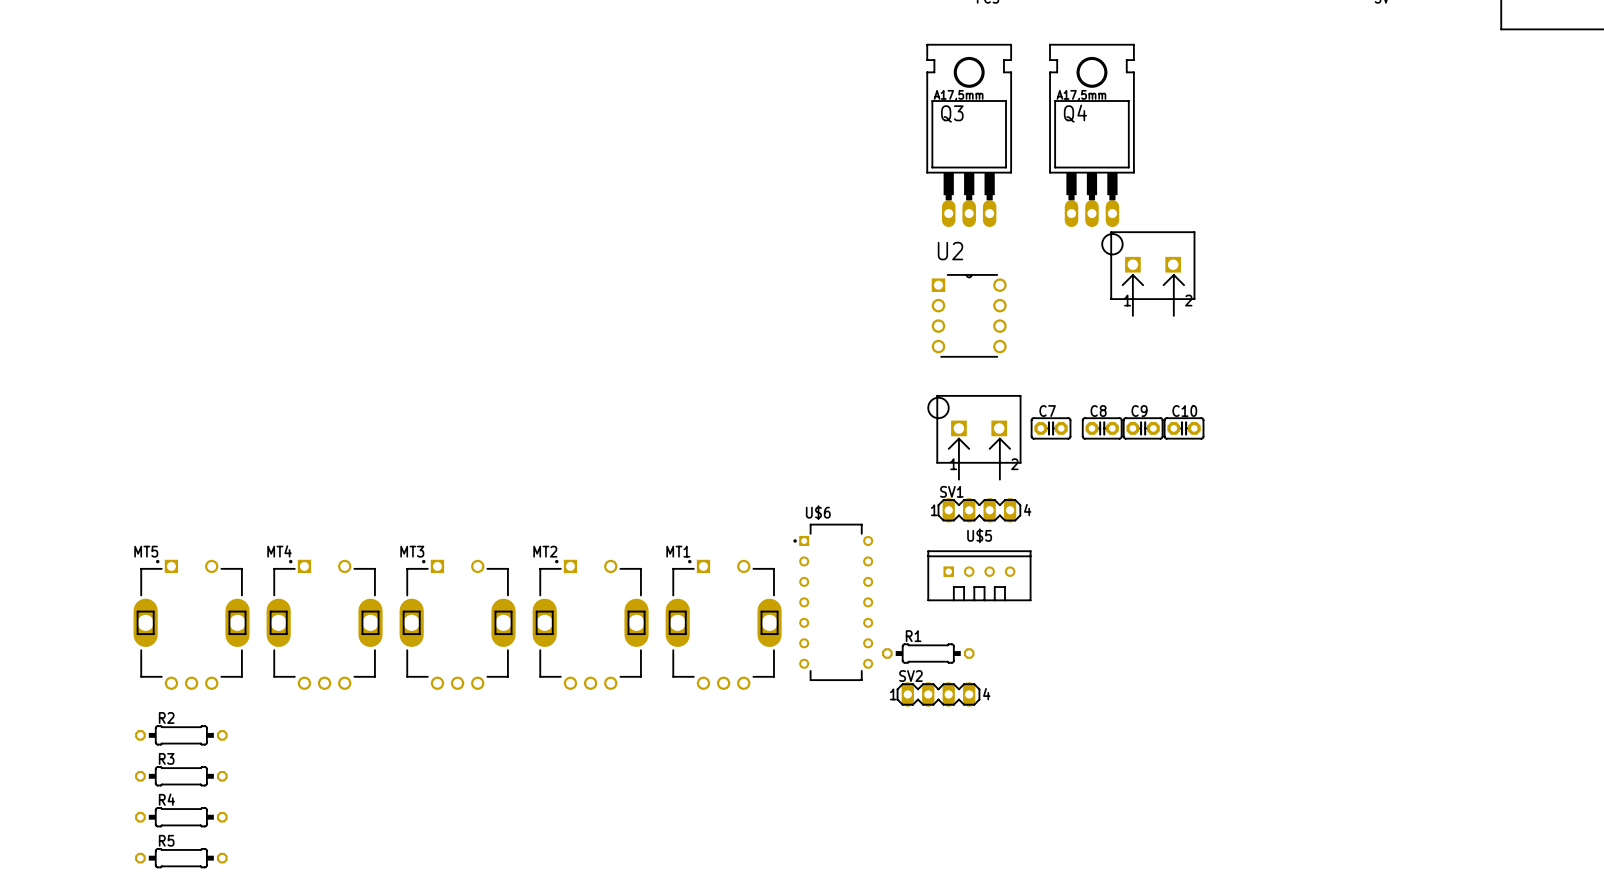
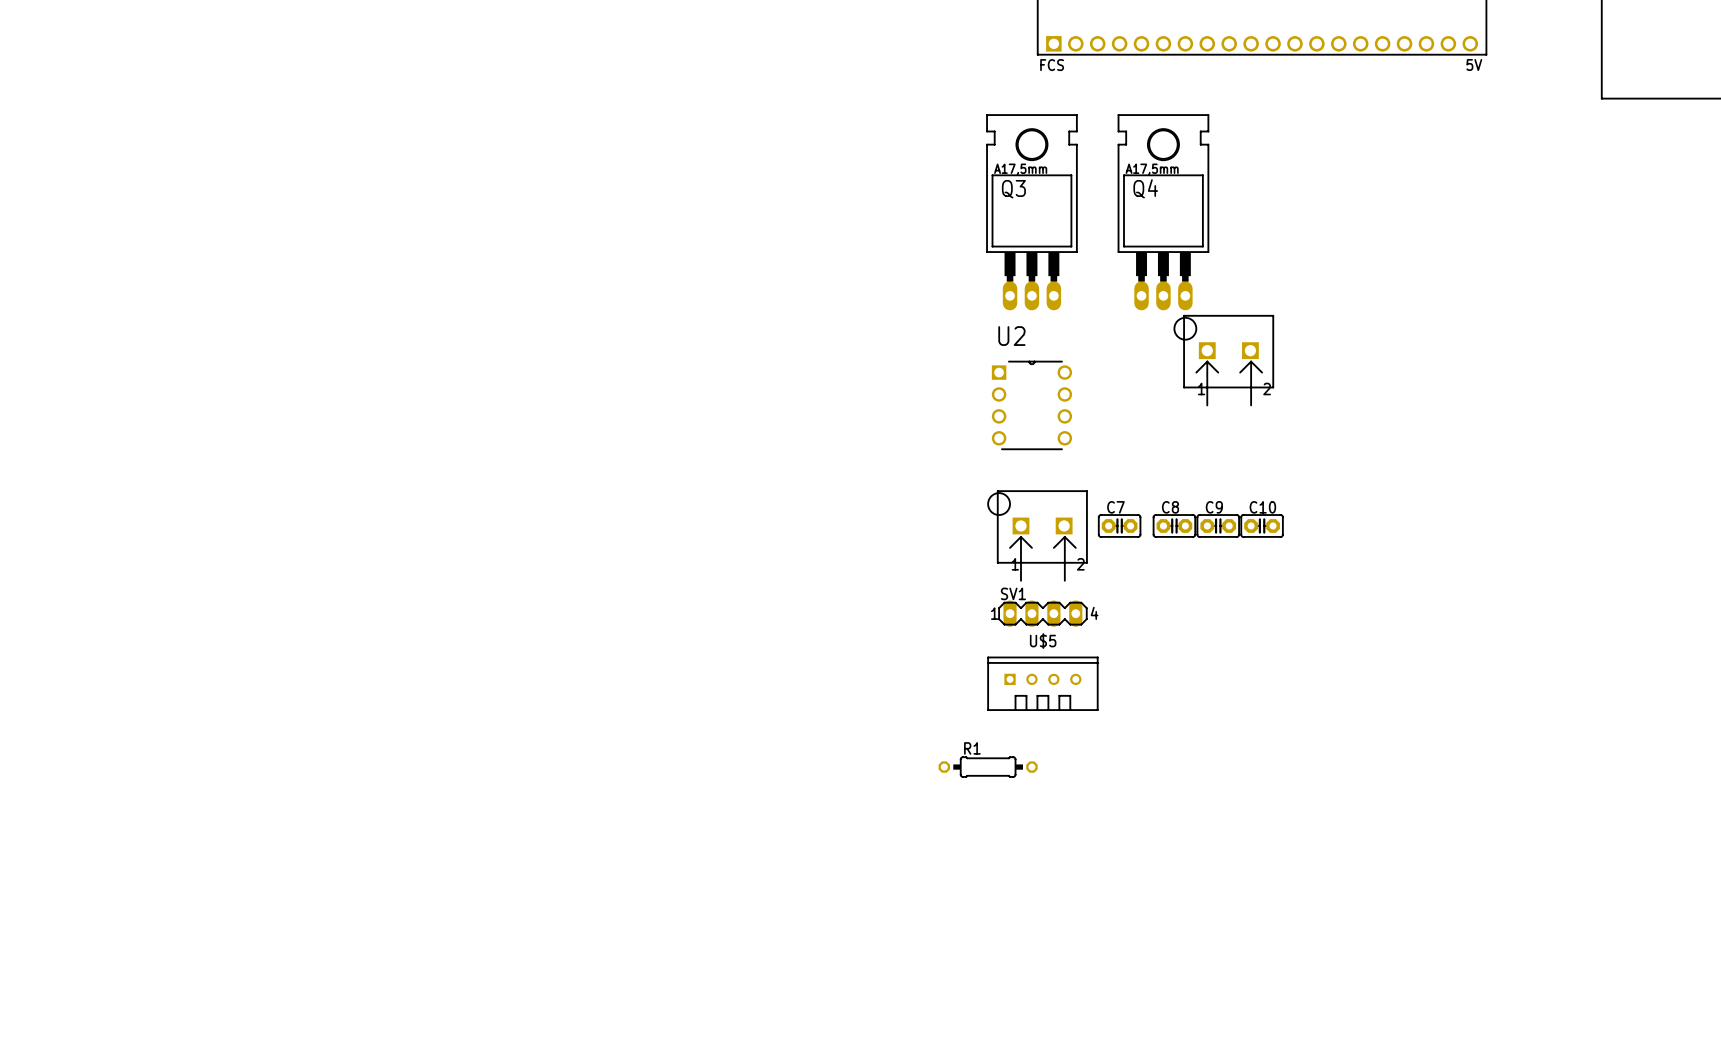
U$6: (833, 602) -> none
MT5: (191, 624) -> none
MT4: (324, 624) -> none
MT3: (457, 624) -> none
MT2: (590, 624) -> none
MT1: (723, 624) -> none
SV2: (938, 694) -> none
R2: (181, 735) -> none
R3: (181, 776) -> none
R4: (181, 817) -> none
R5: (181, 858) -> none

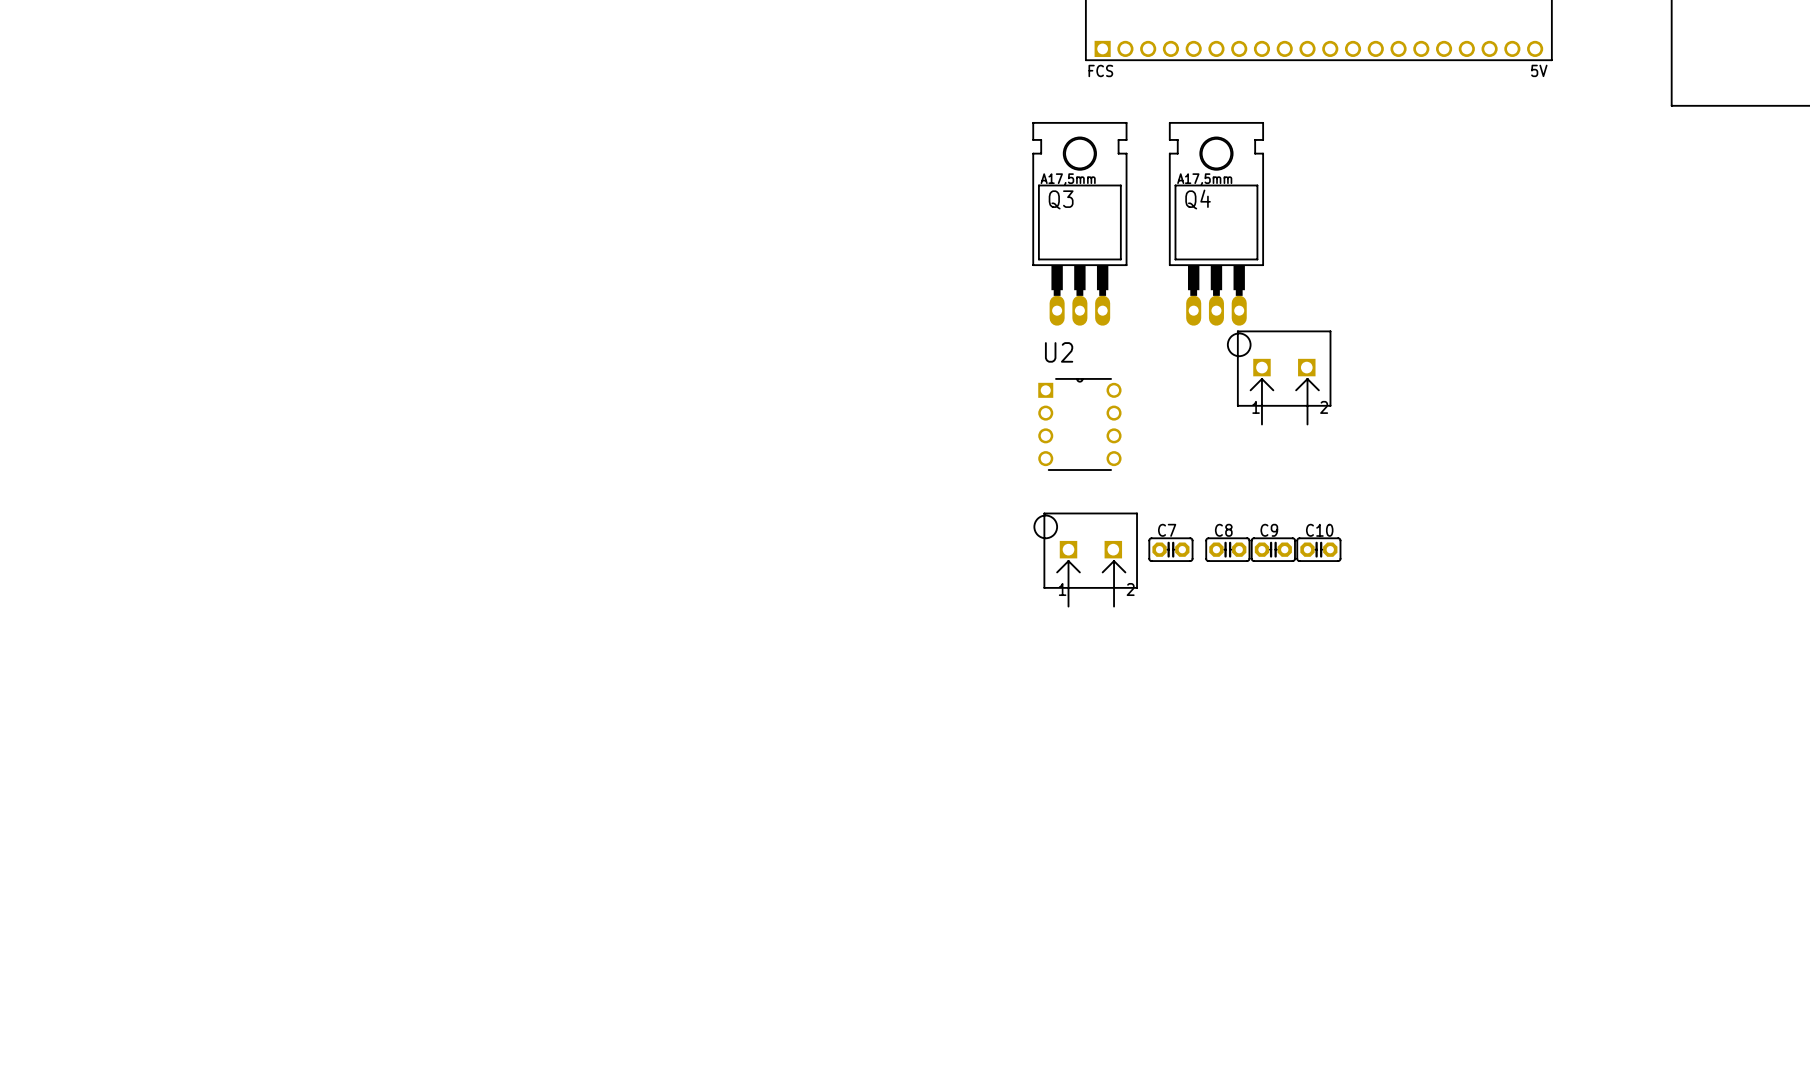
SV1: (1042, 613) -> none
U$5: (1042, 683) -> none
R1: (988, 767) -> none

